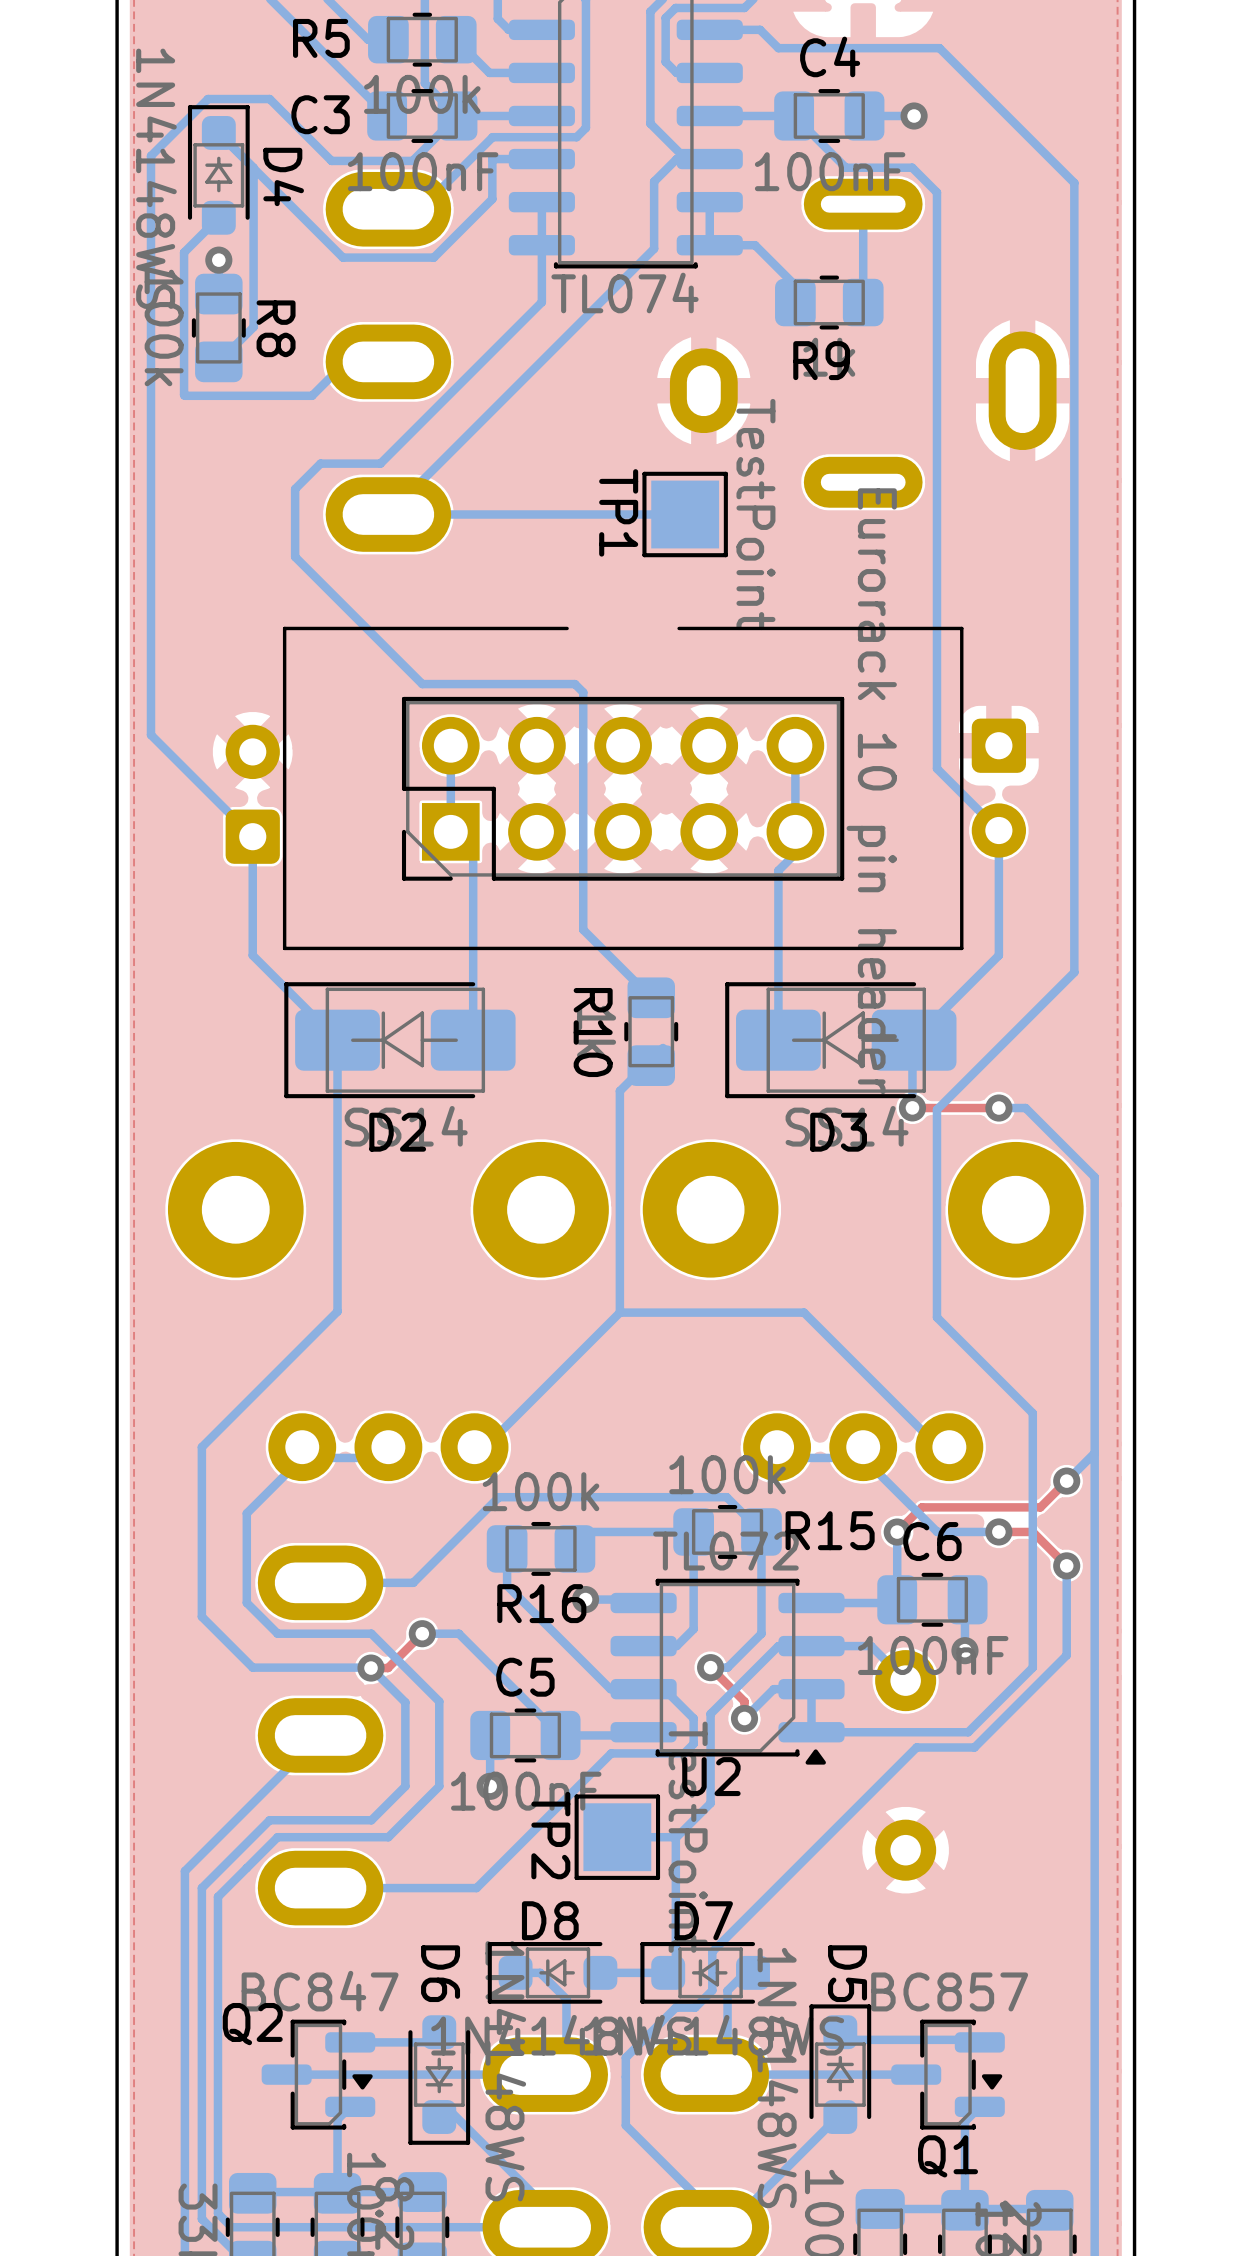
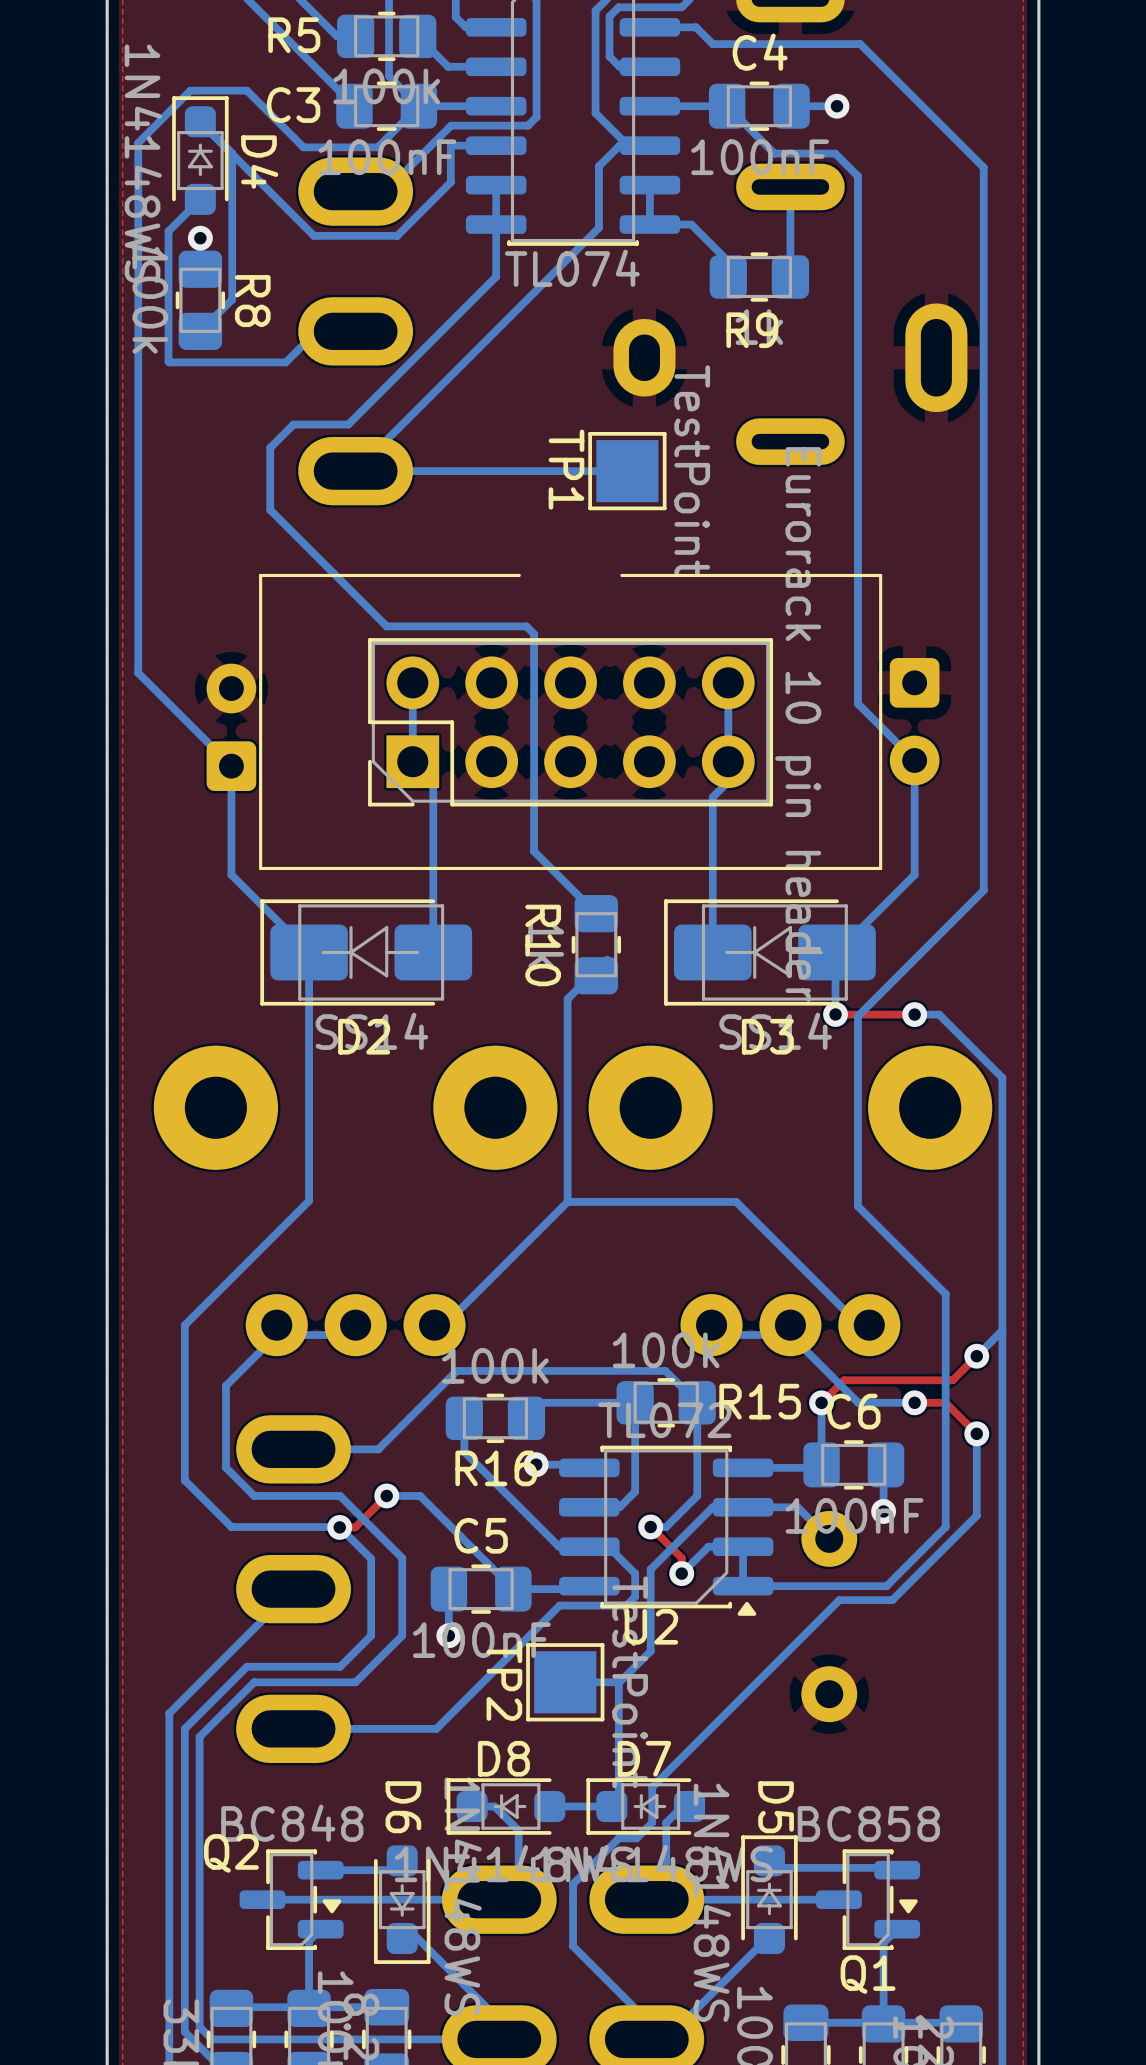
Q2 value: BC847 (320, 1991) -> BC848 (292, 1823)
Q1 value: BC857 (949, 1991) -> BC858 (868, 1823)

